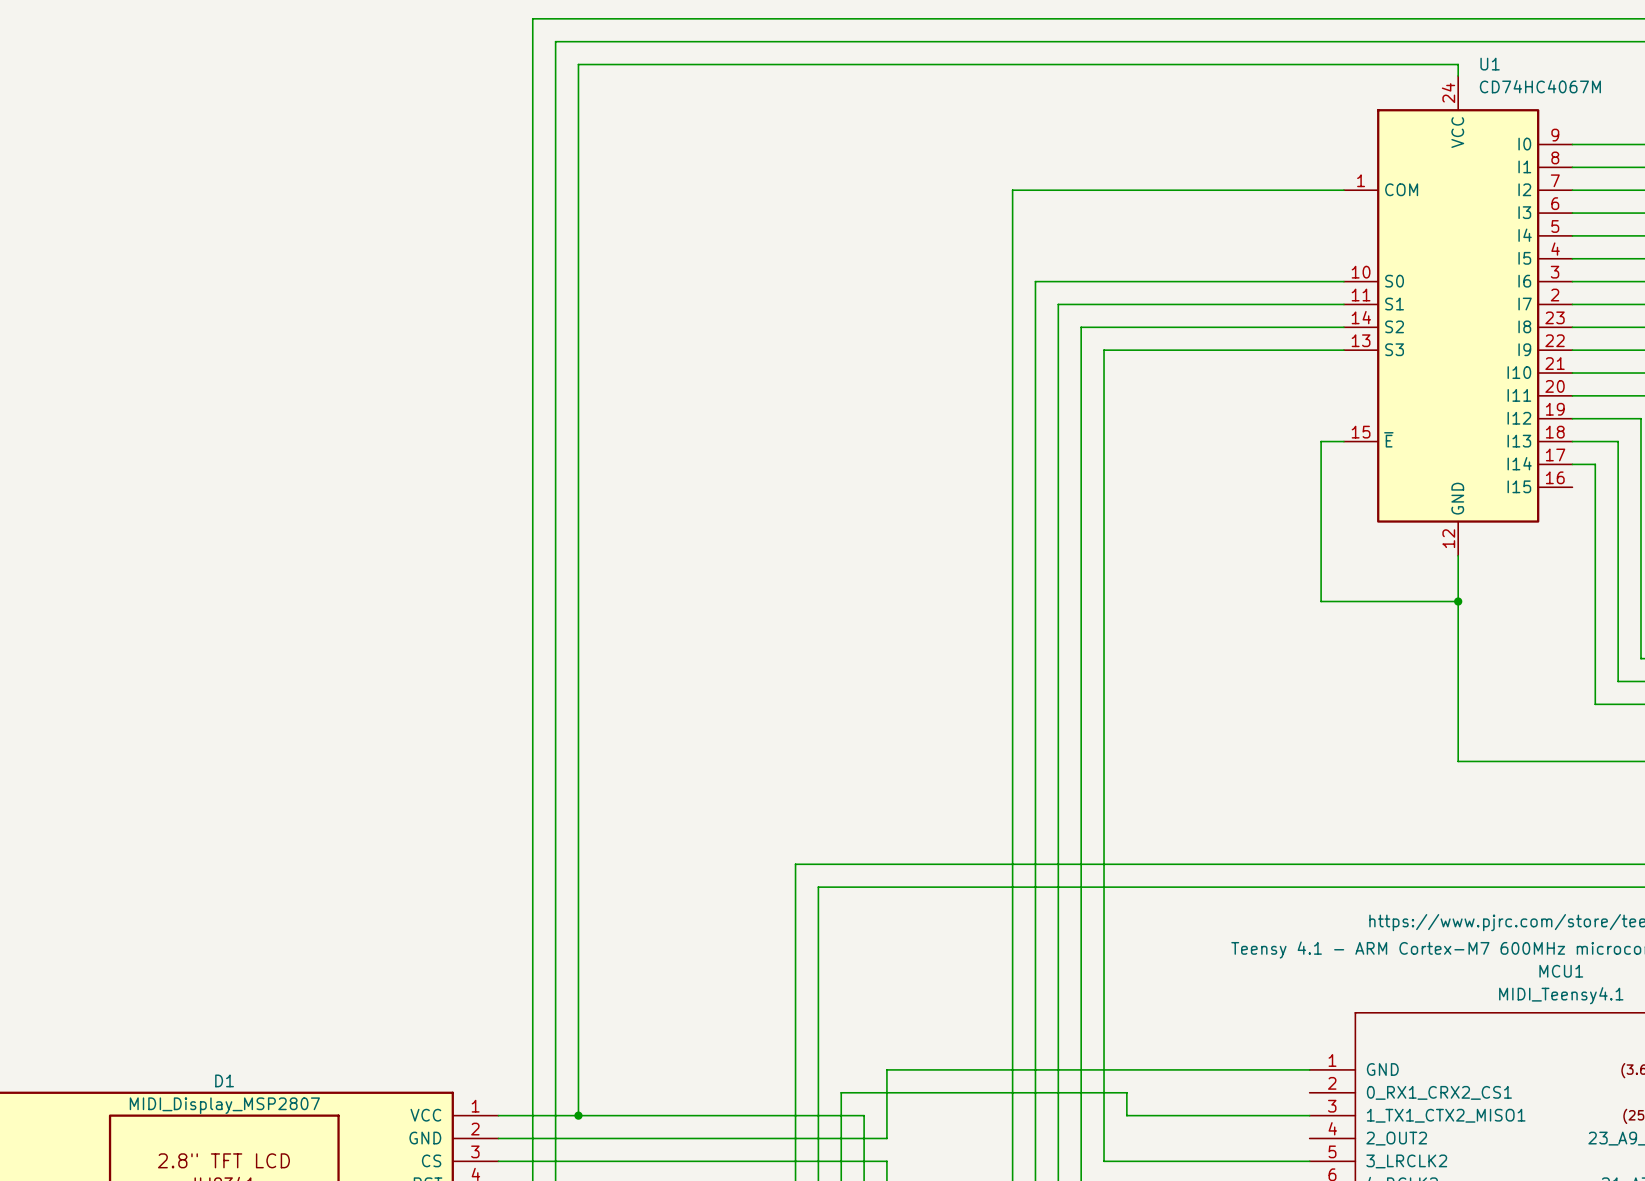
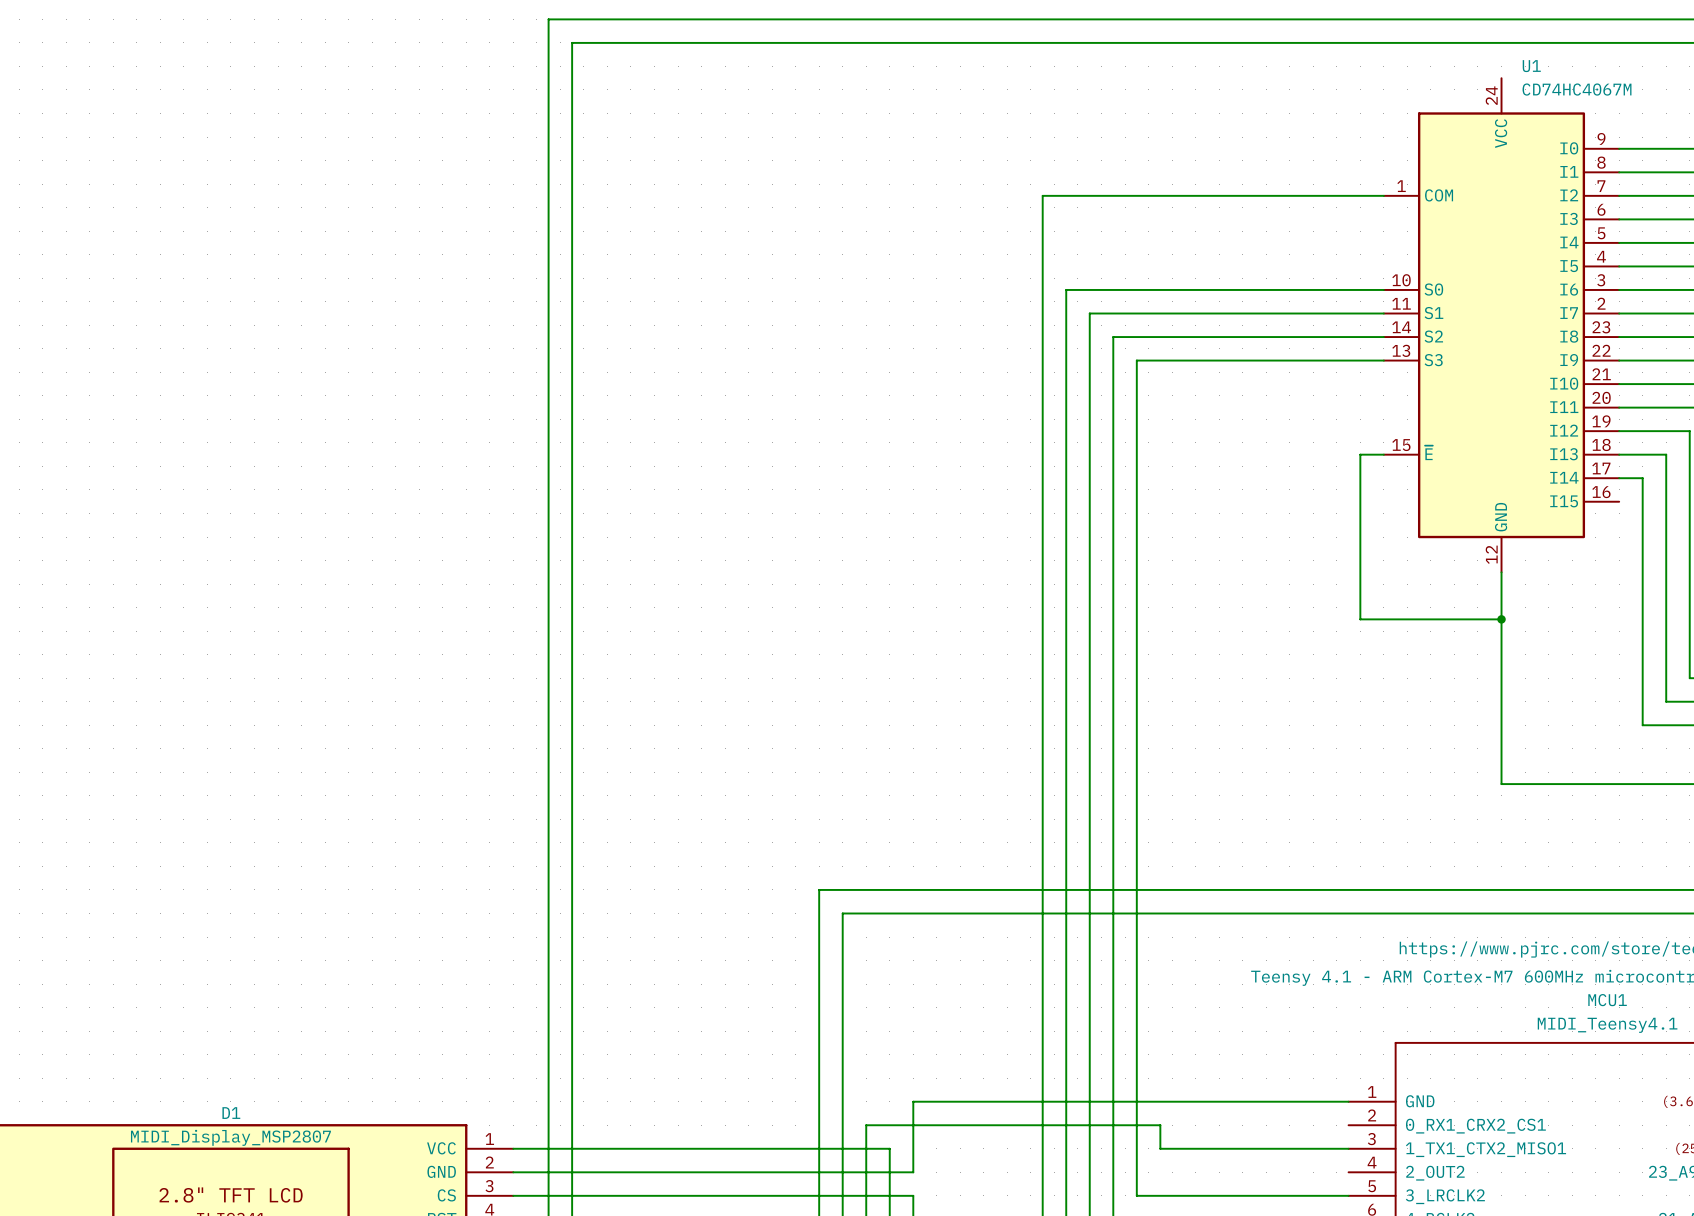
wire: (1458, 75) (1458, 64) (578, 64) (578, 1115) -> none
junction: (578, 1115) -> none

